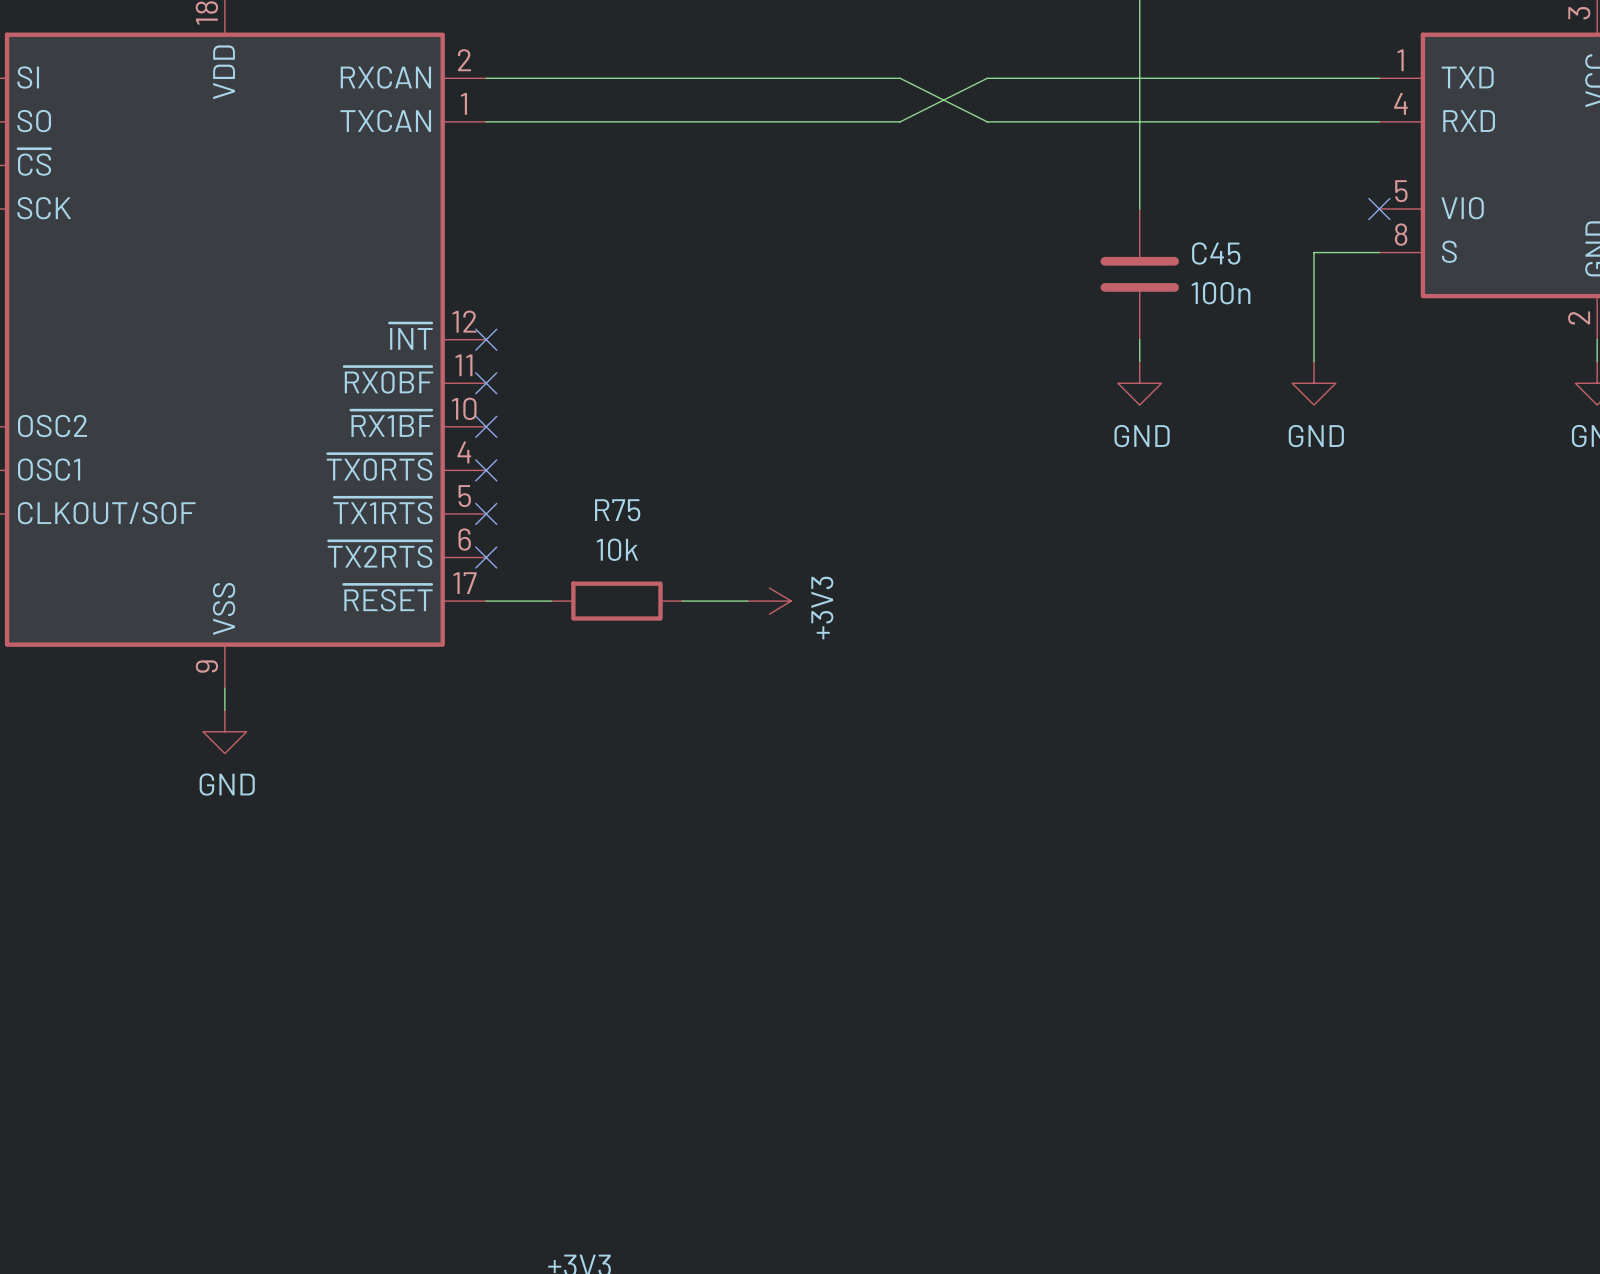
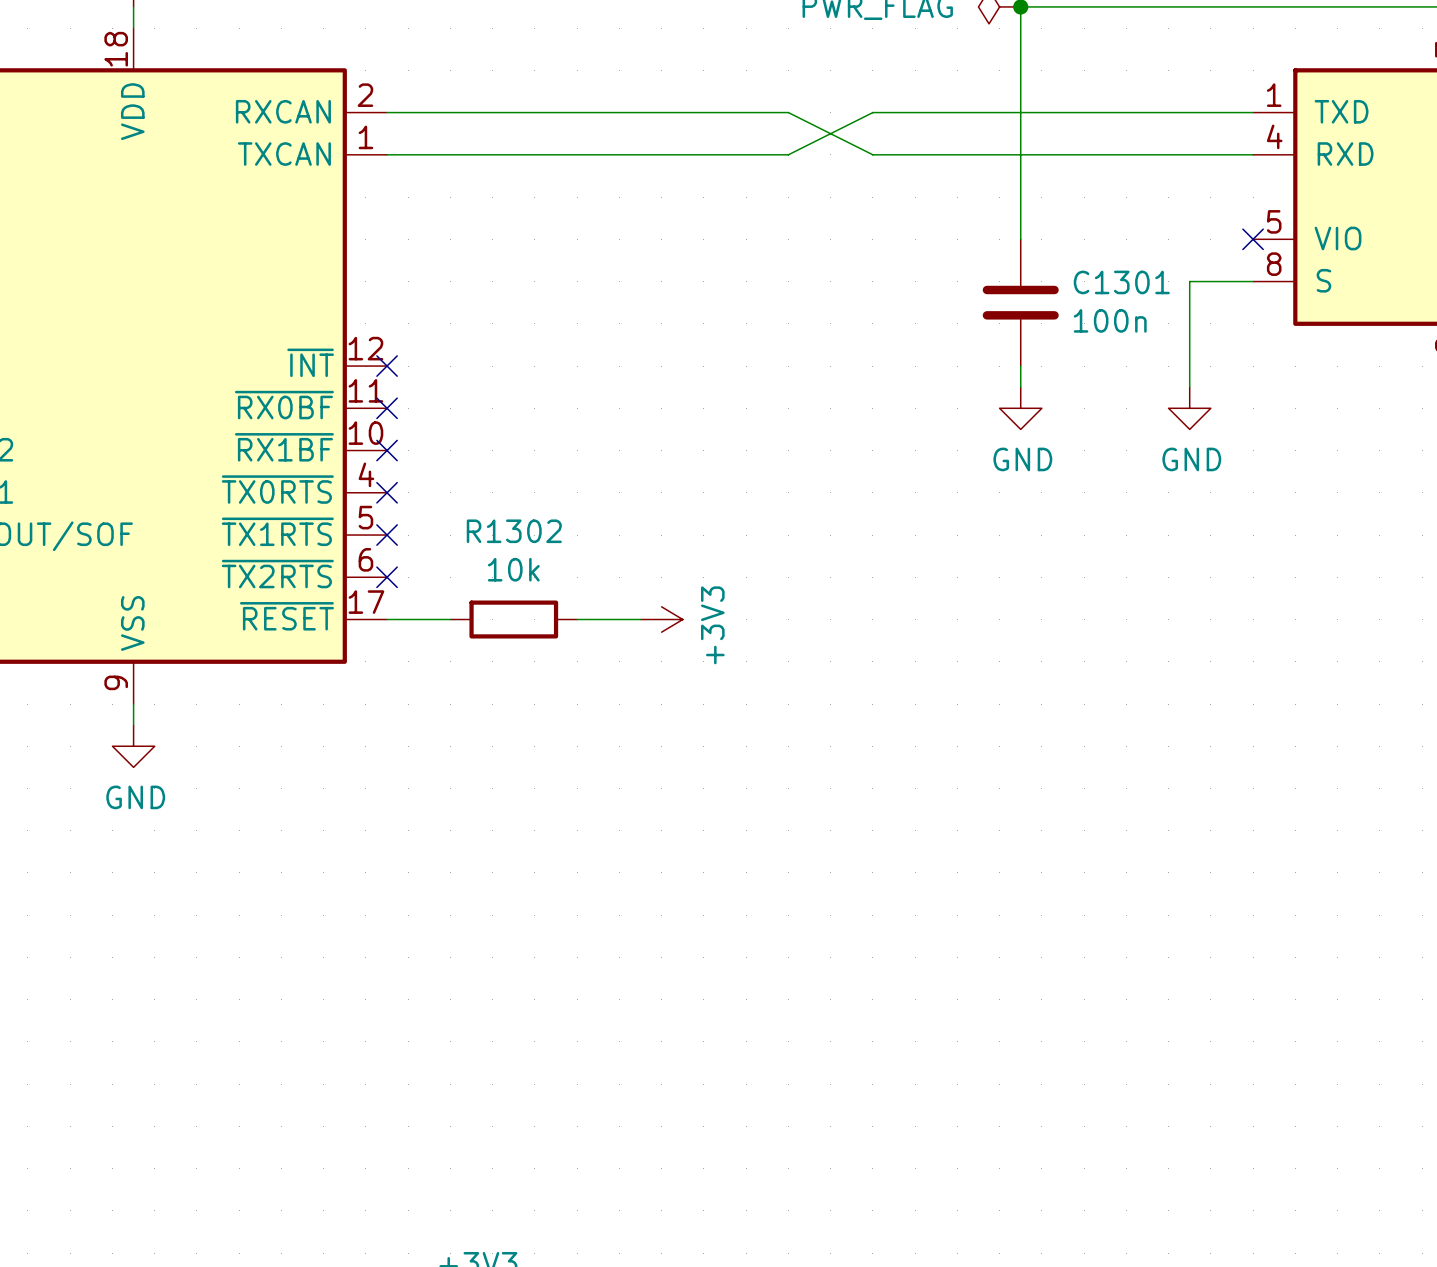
C45 name: C45 (1216, 253) -> C1301 (1121, 282)
R75 name: R75 (617, 510) -> R1302 (514, 531)

